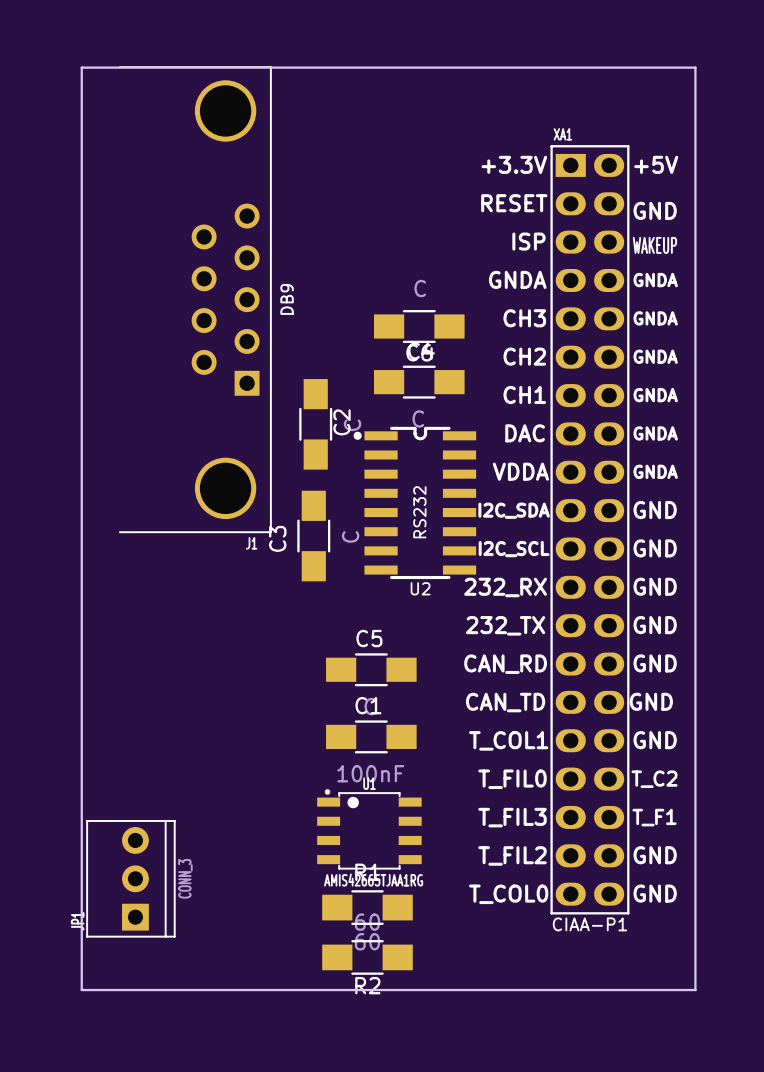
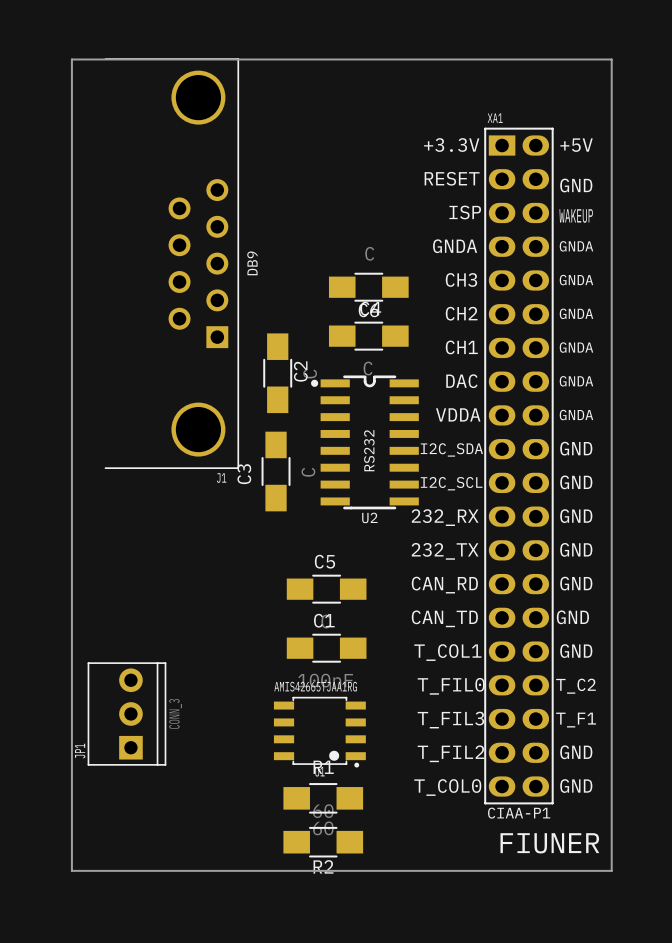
U1 rotation: 0° (369, 829) -> 180° (319, 732)
JP1 position: (130, 878) -> (126, 713)
text: none -> FIUNER (549, 843)

